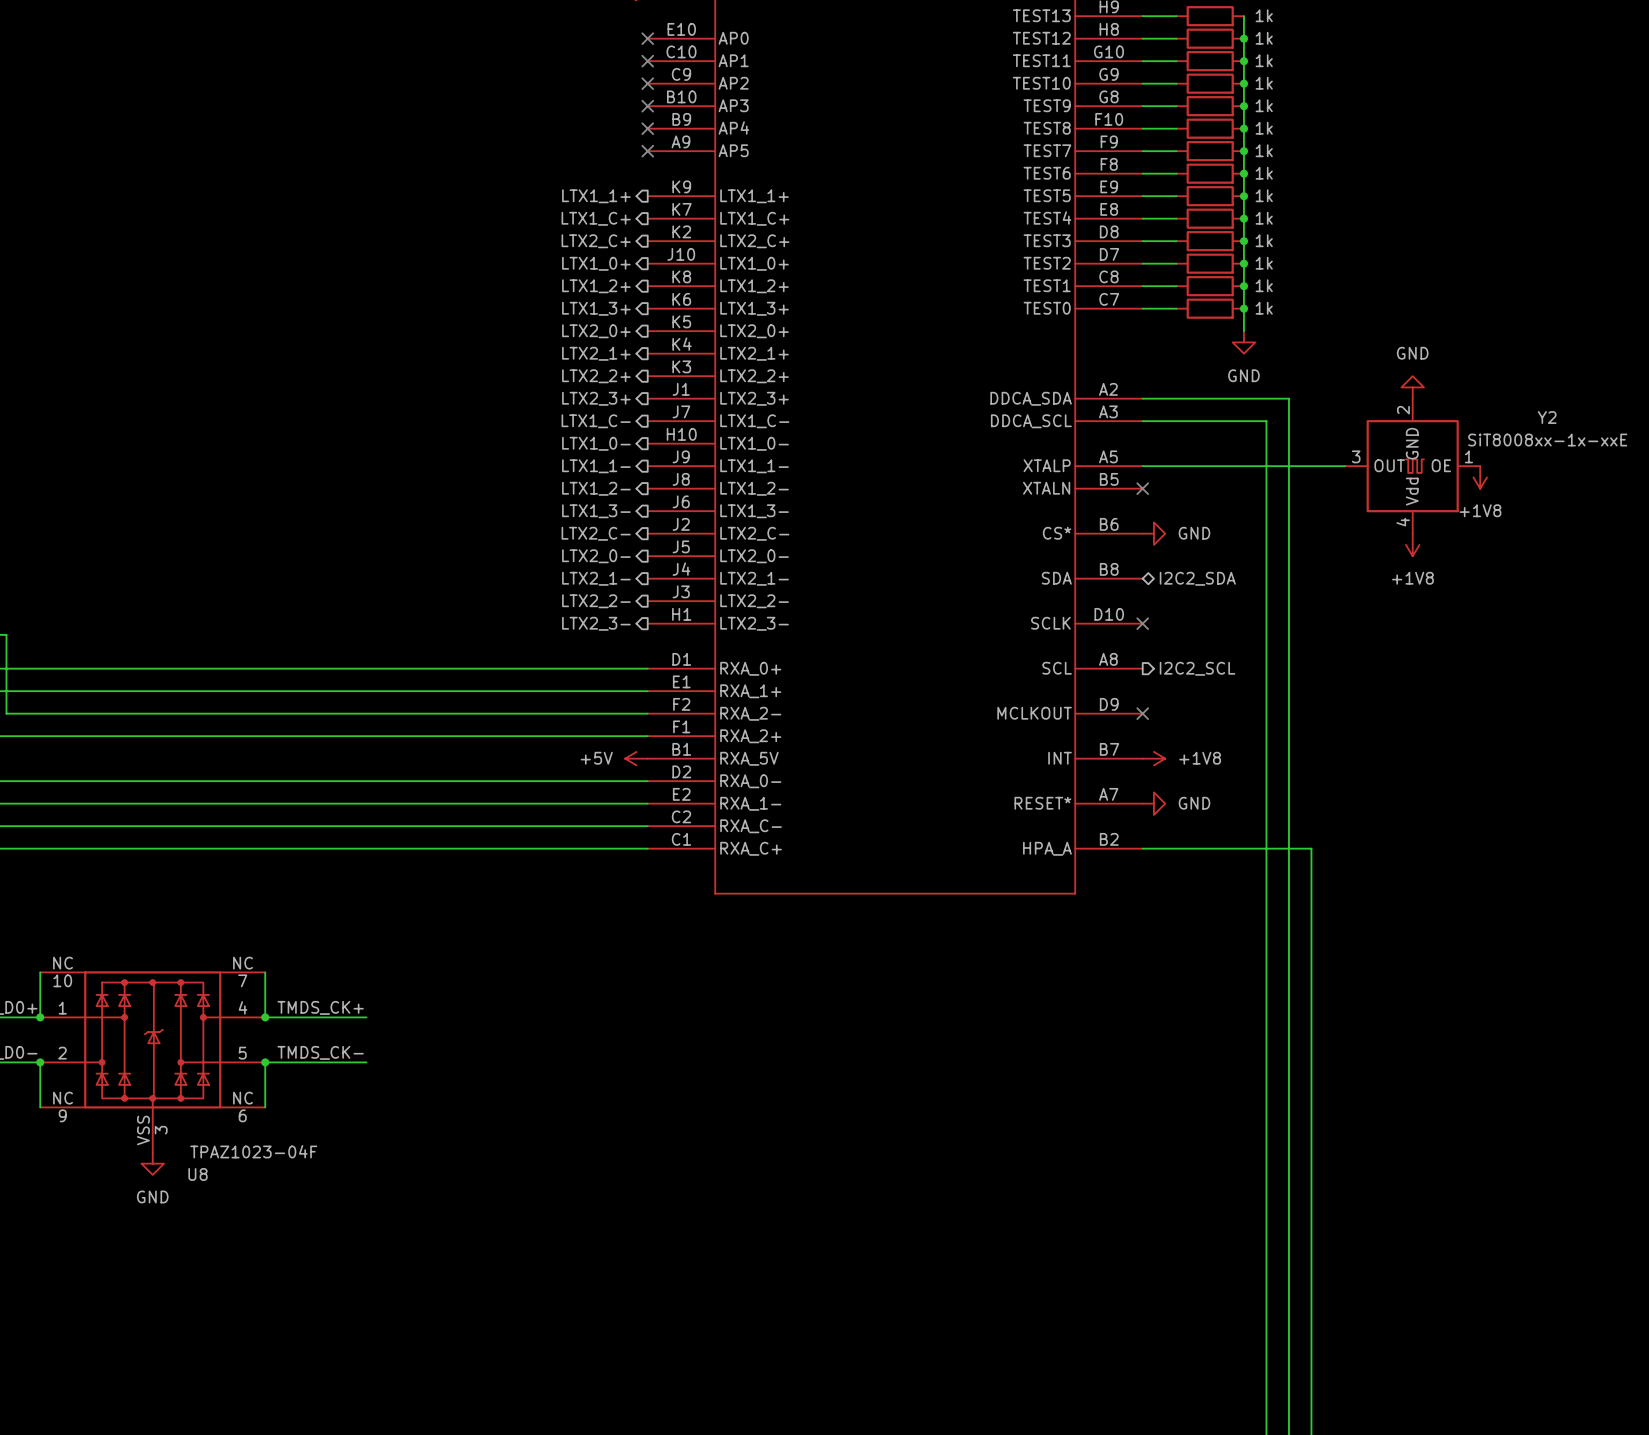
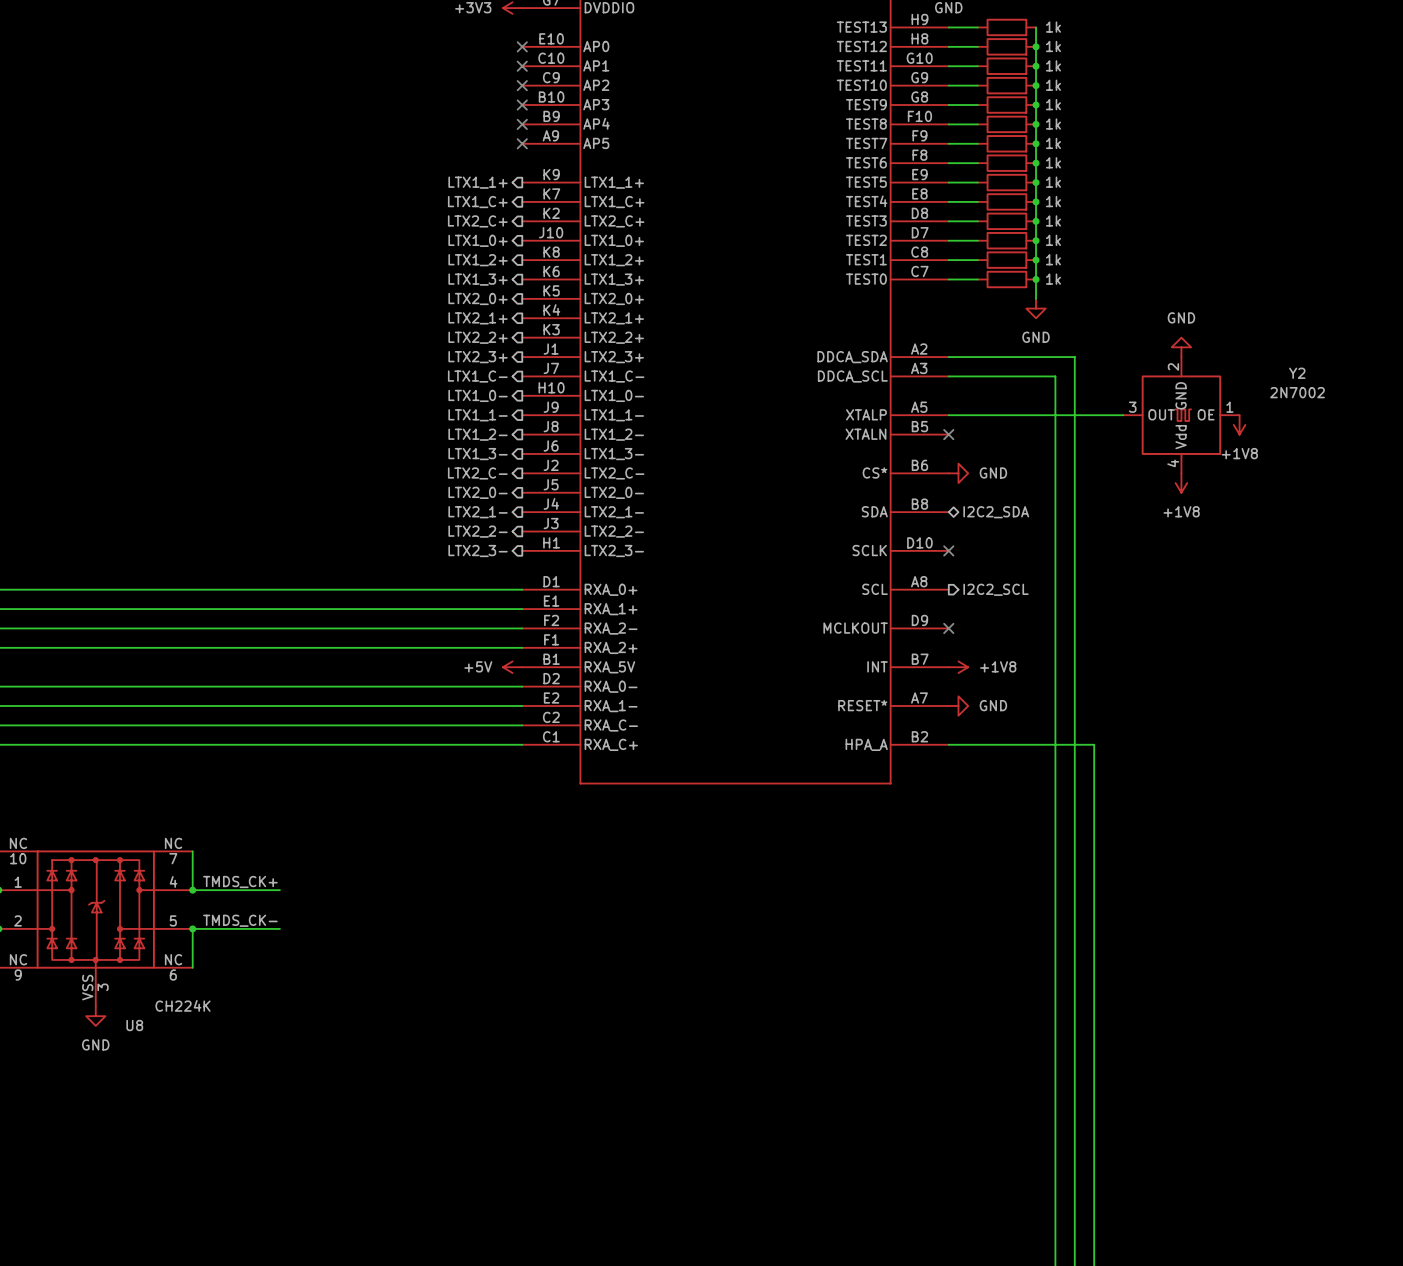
Y2 value: SiT8008xx-1x-xxE (1547, 440) -> 2N7002 (1297, 392)
U8 value: TPAZ1023-04F (253, 1151) -> CH224K (183, 1005)

